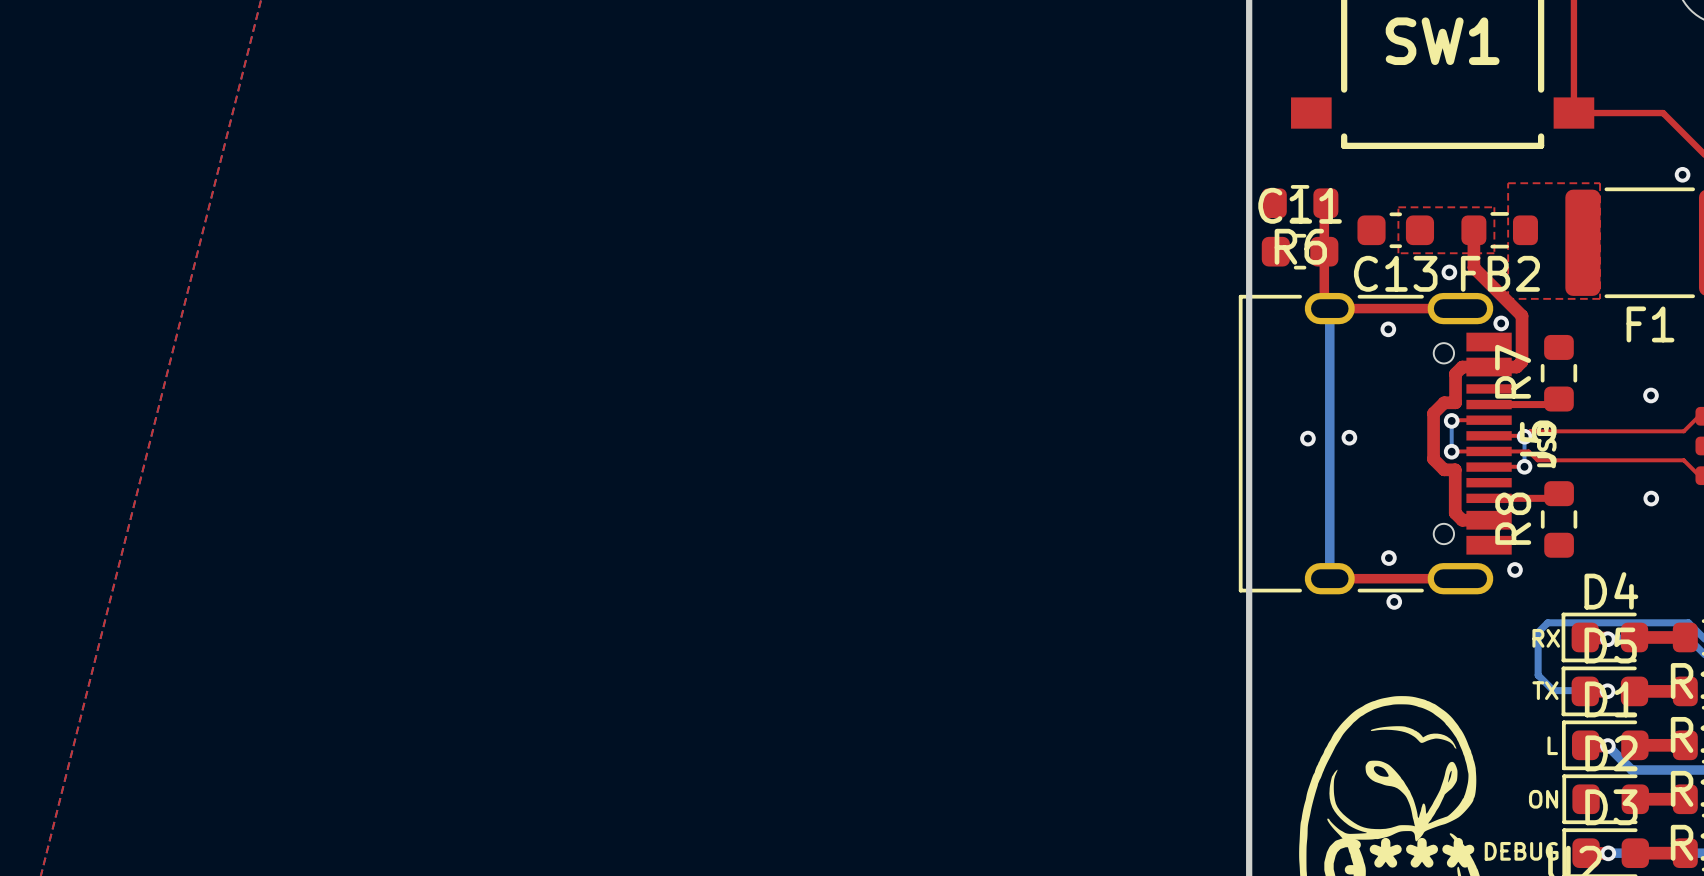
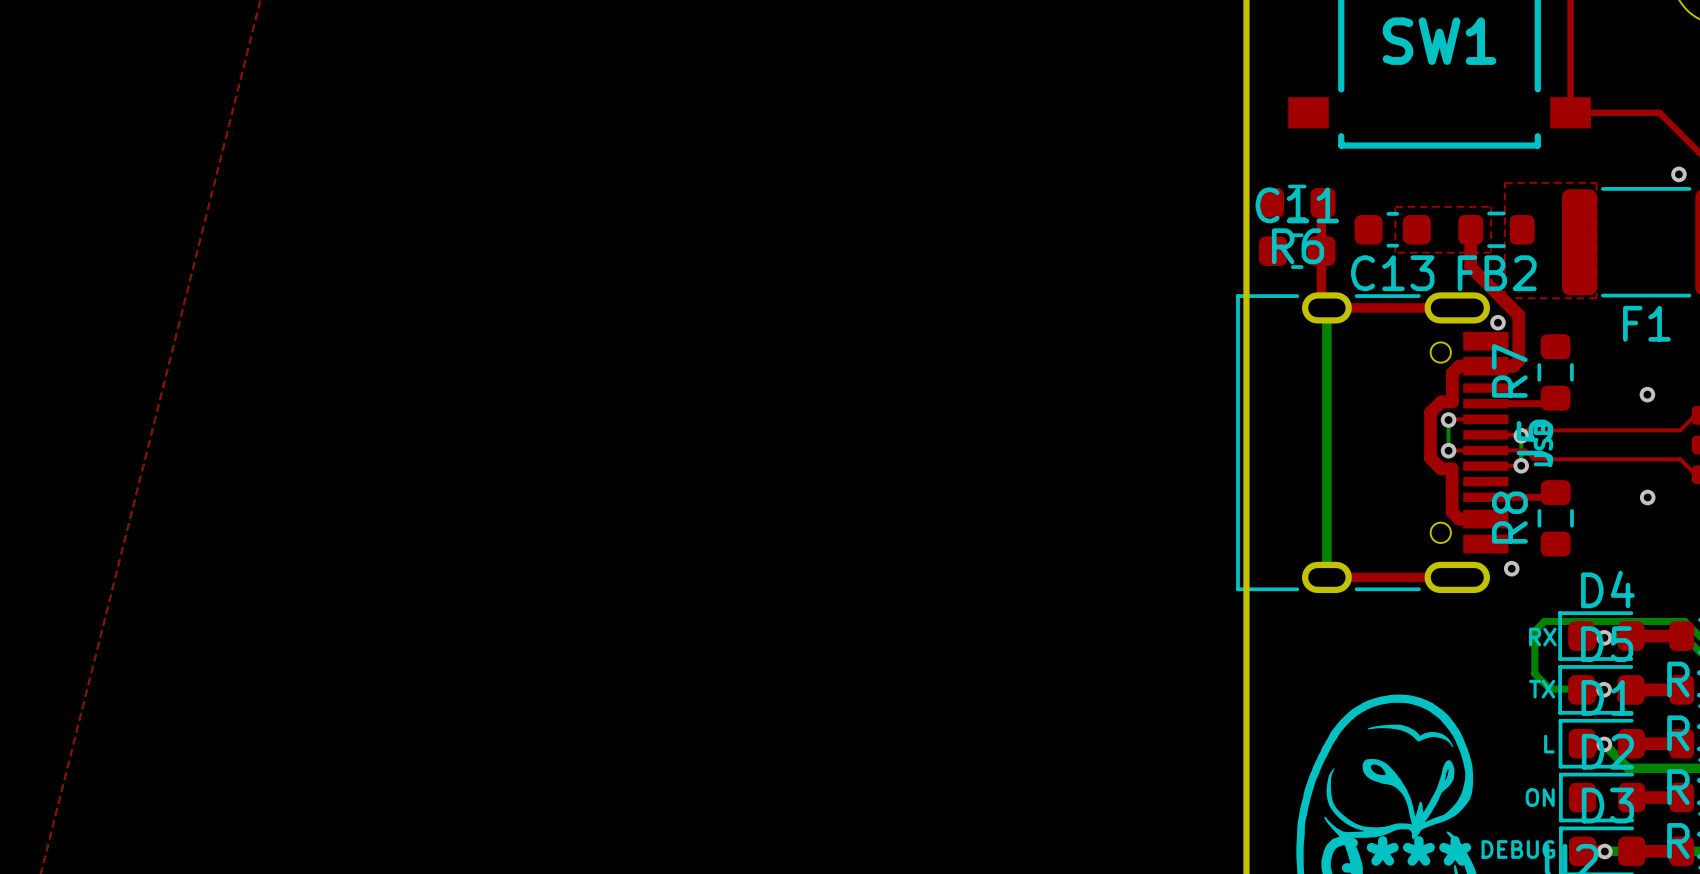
via: (1449, 272) -> none
via: (1388, 329) -> none
via: (1349, 437) -> none
via: (1307, 438) -> none
via: (1388, 558) -> none
via: (1394, 601) -> none

